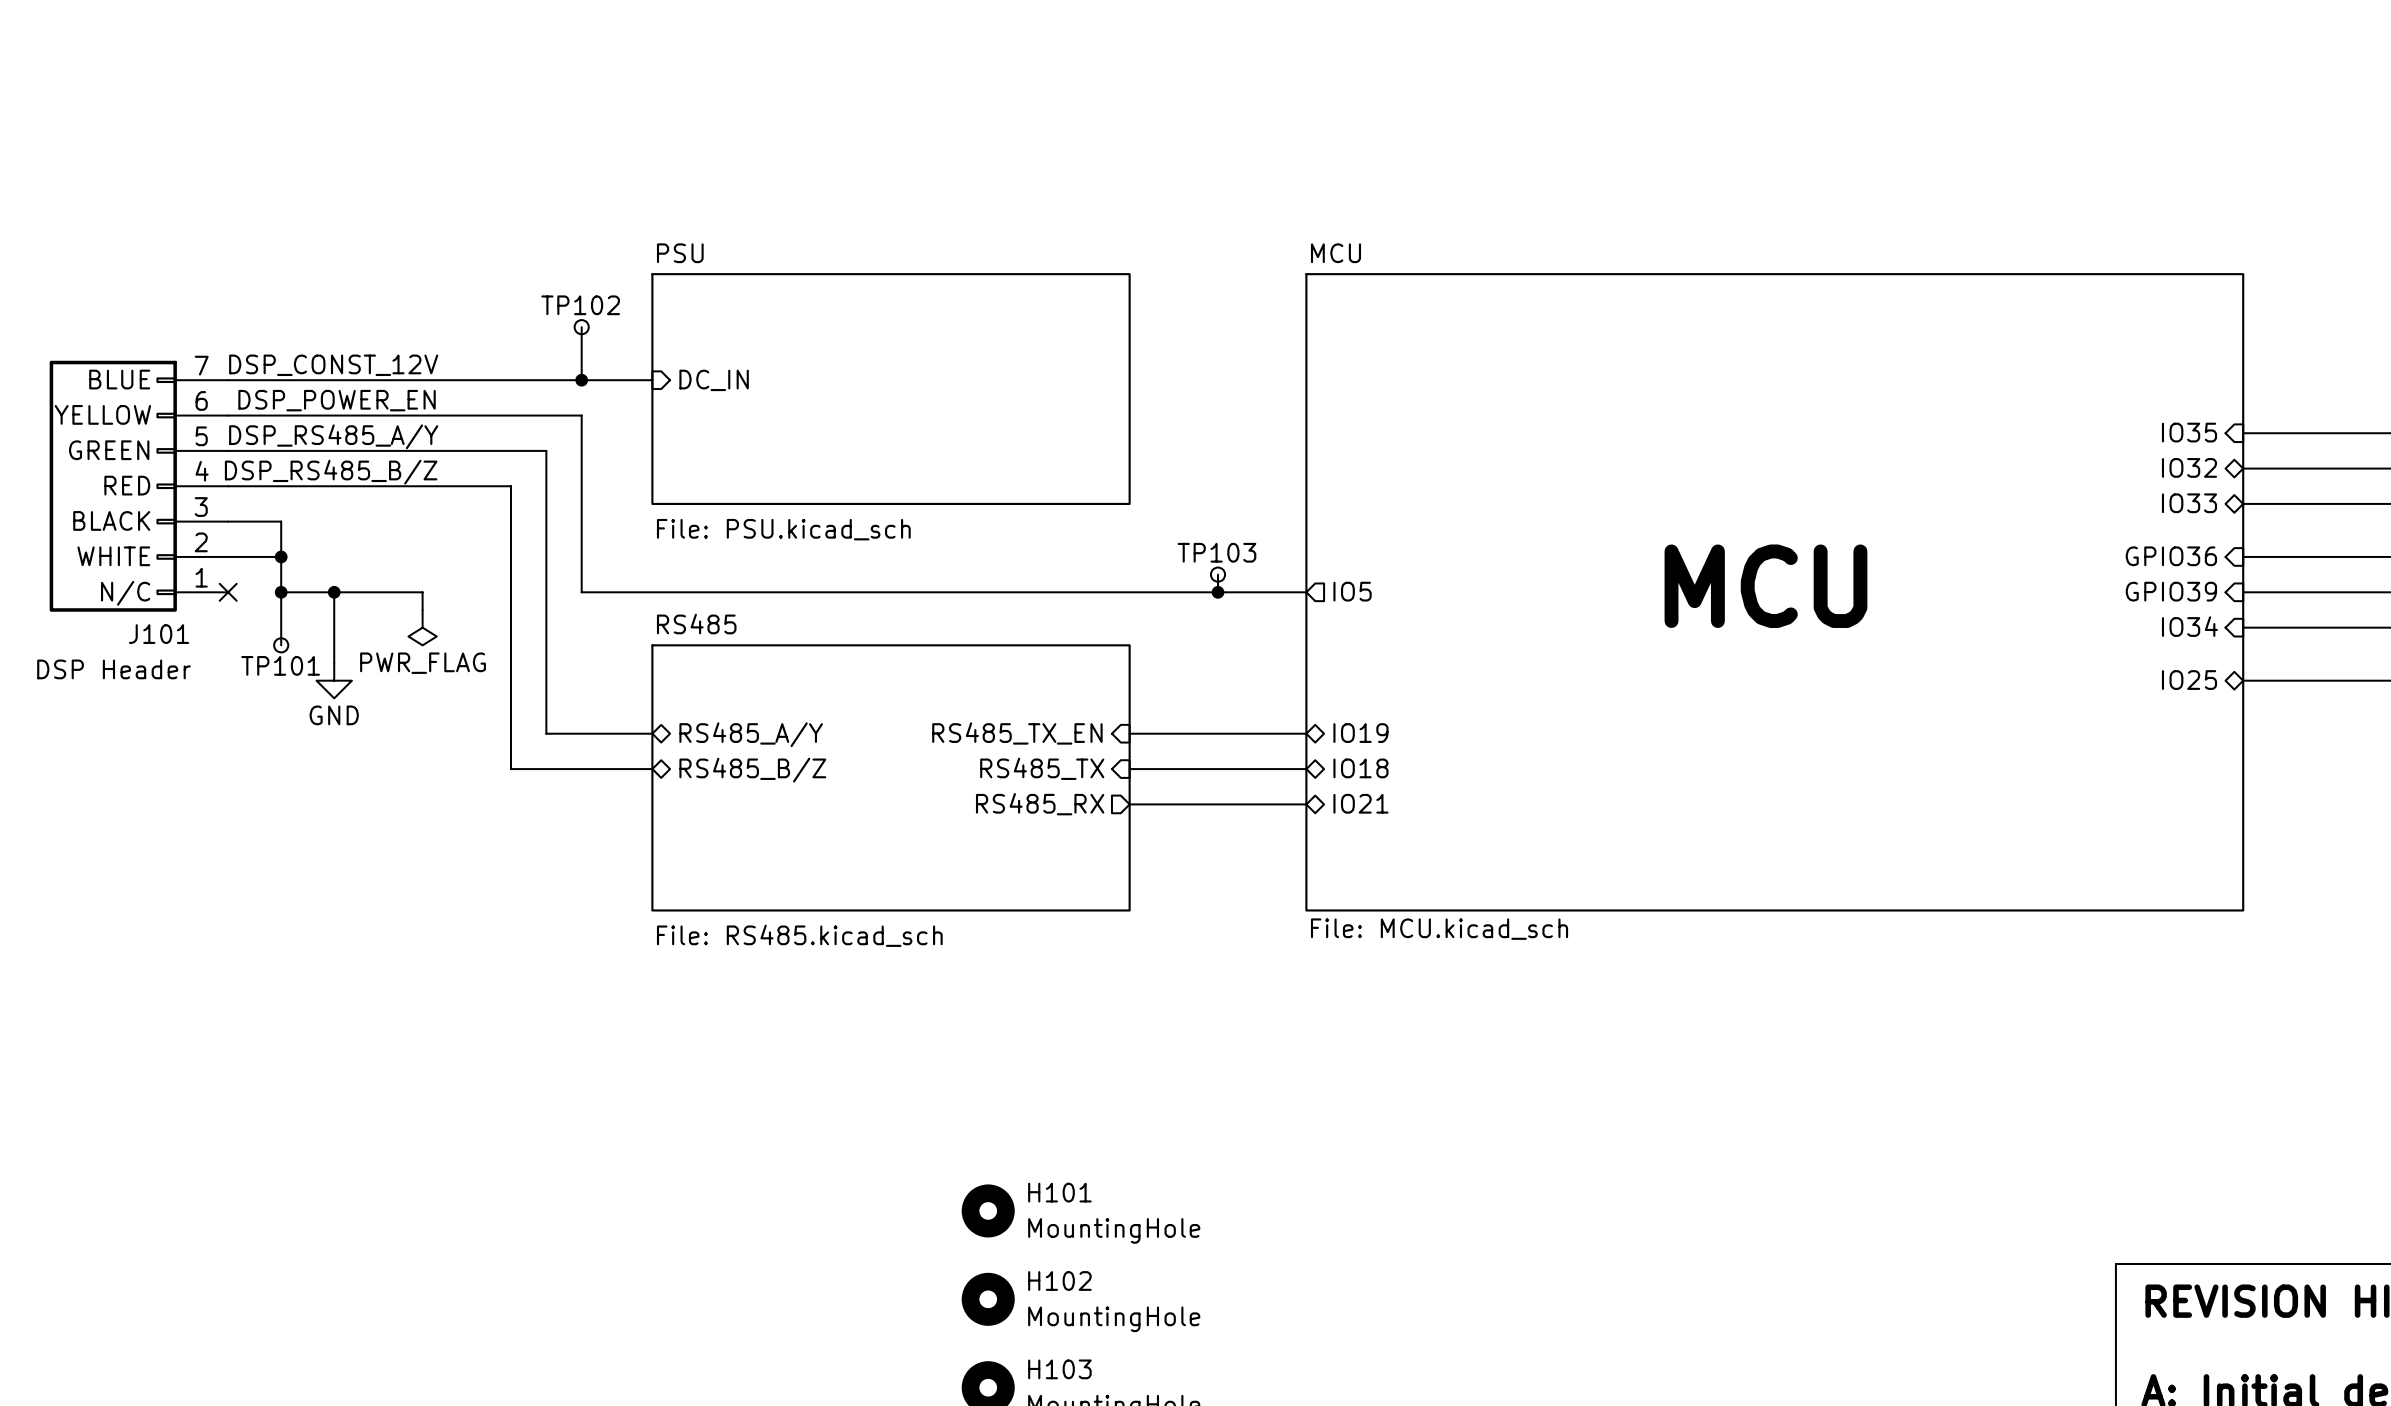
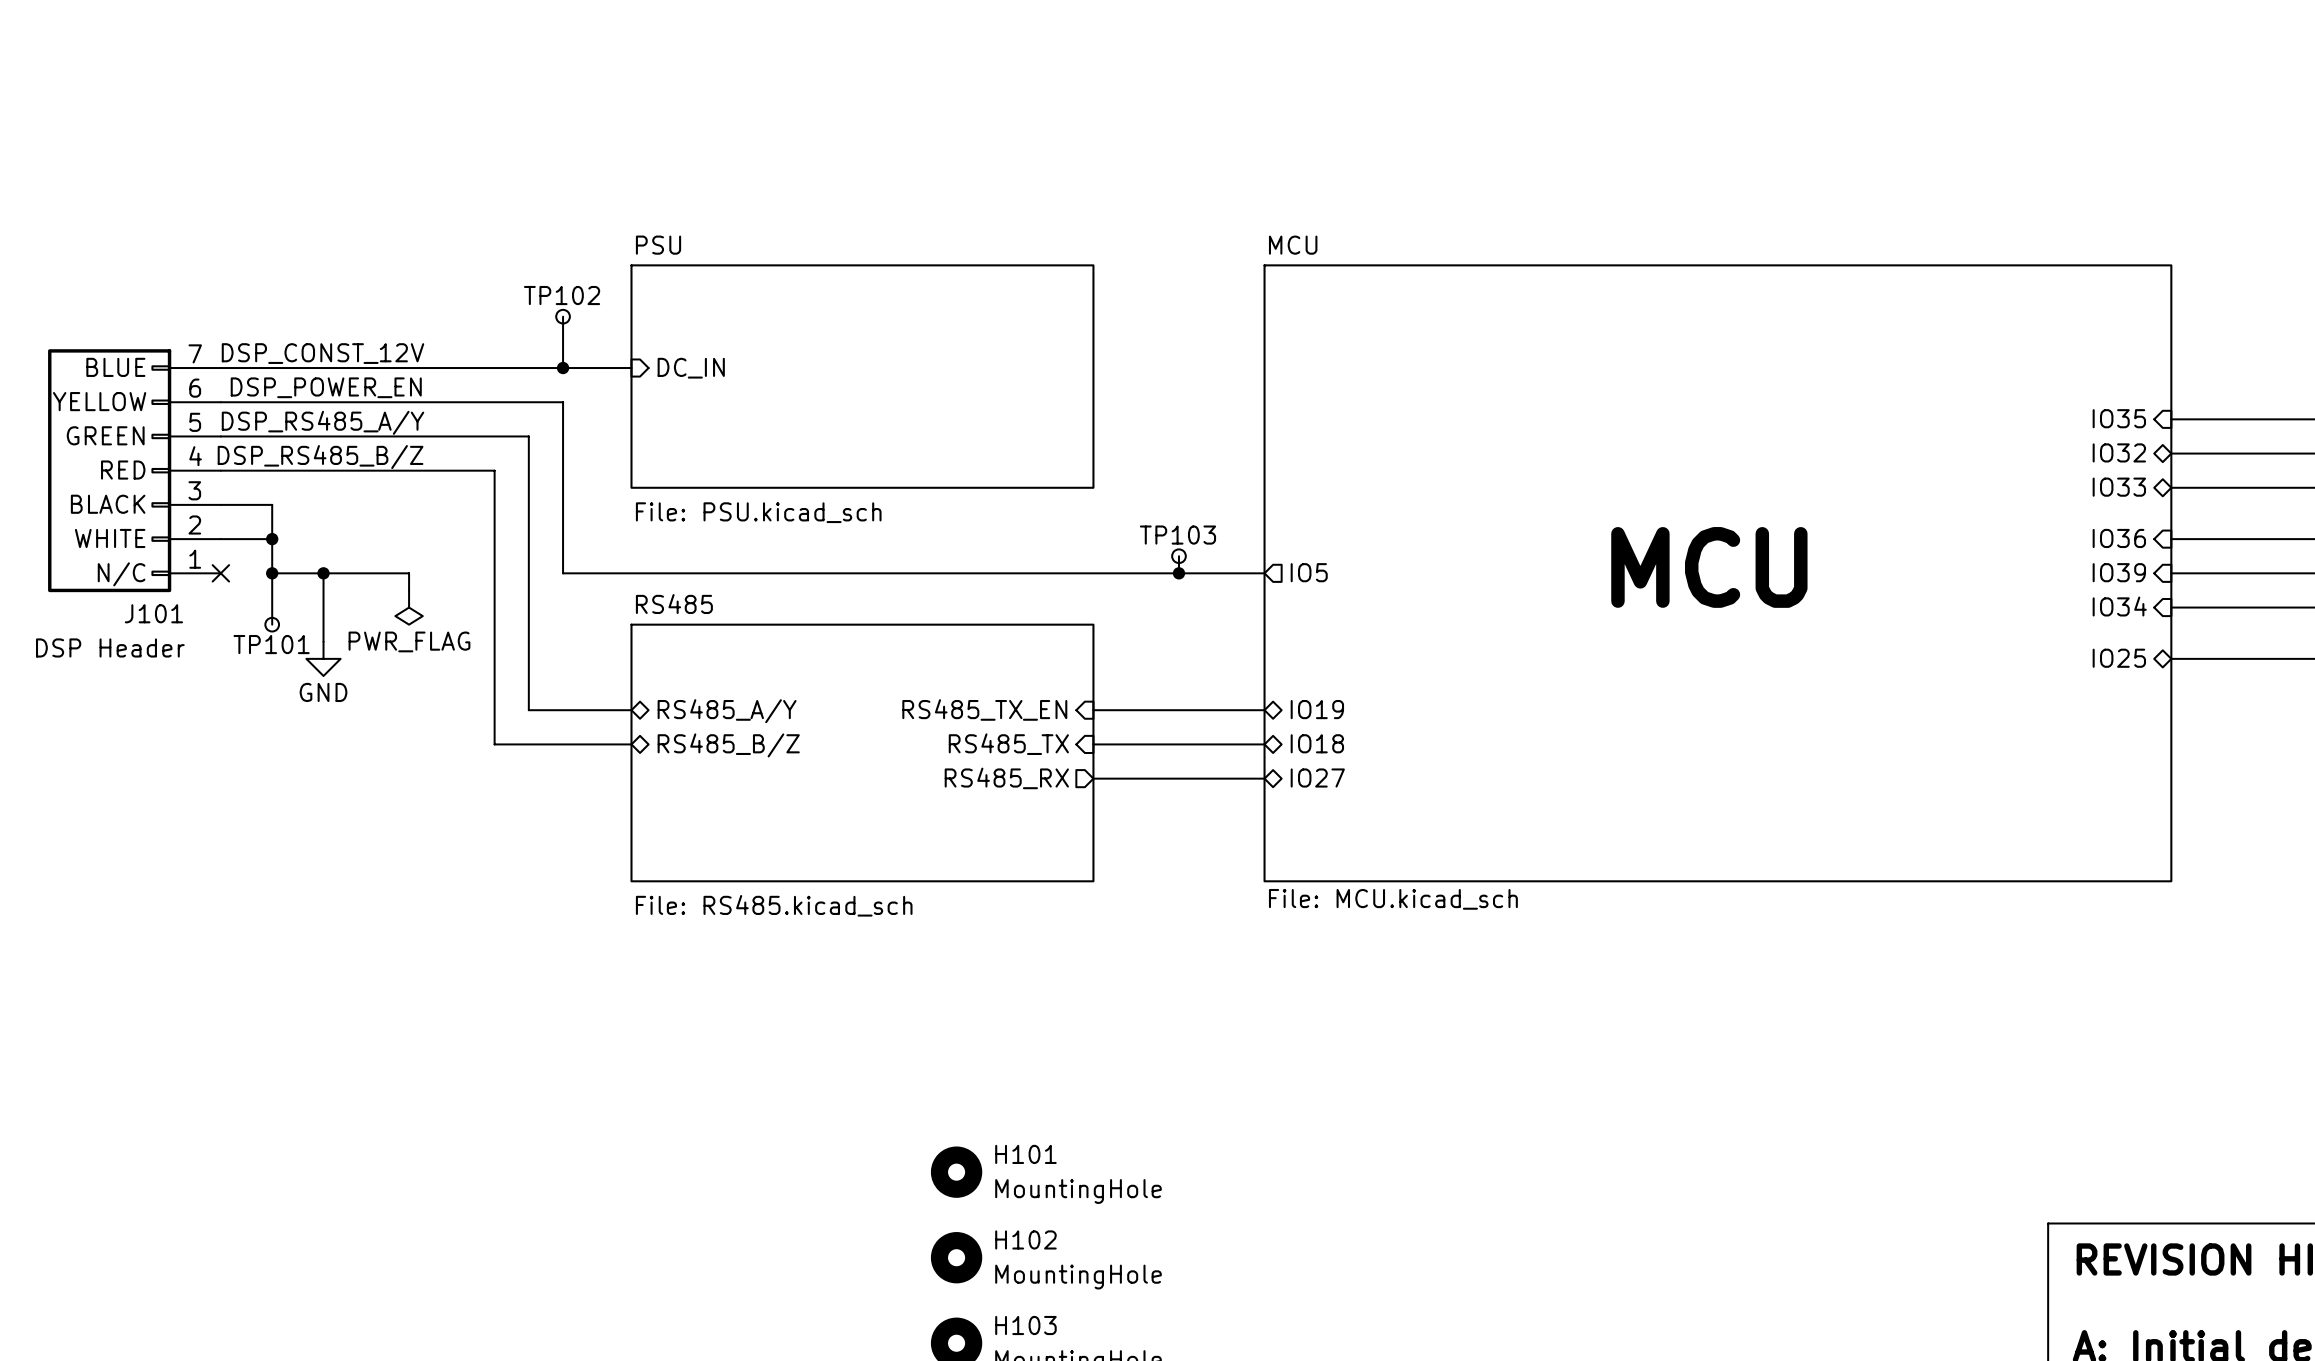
sheet pin: GPIO36 (2171, 556) -> IO36 (2119, 538)
sheet pin: GPIO39 (2171, 591) -> IO39 (2119, 572)
sheet pin: IO21 (1360, 803) -> IO27 (1317, 778)

